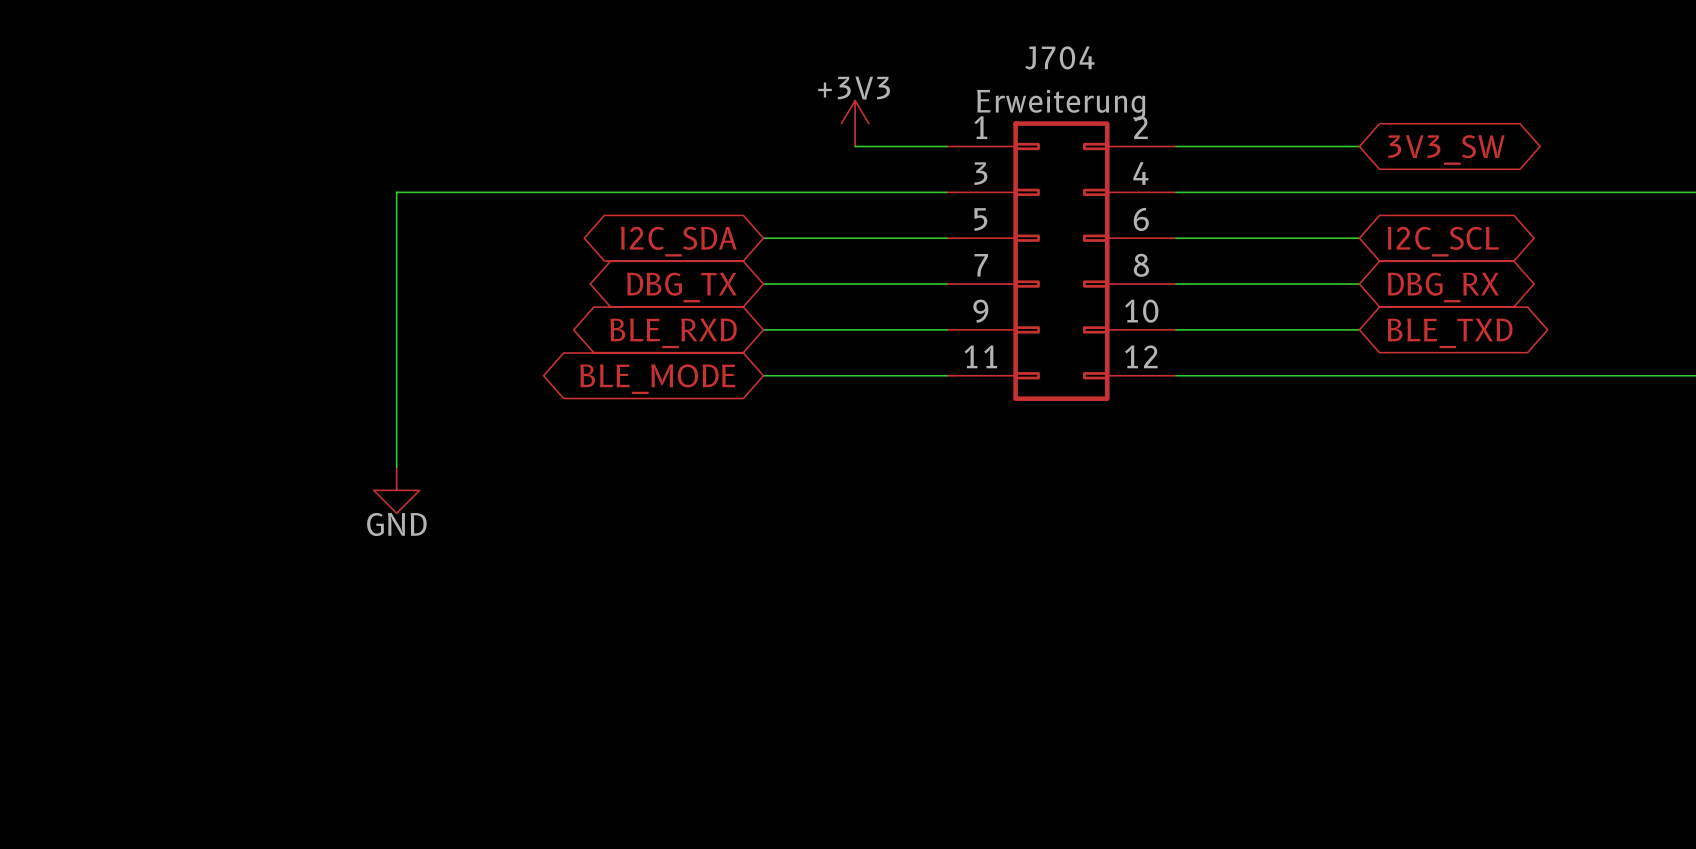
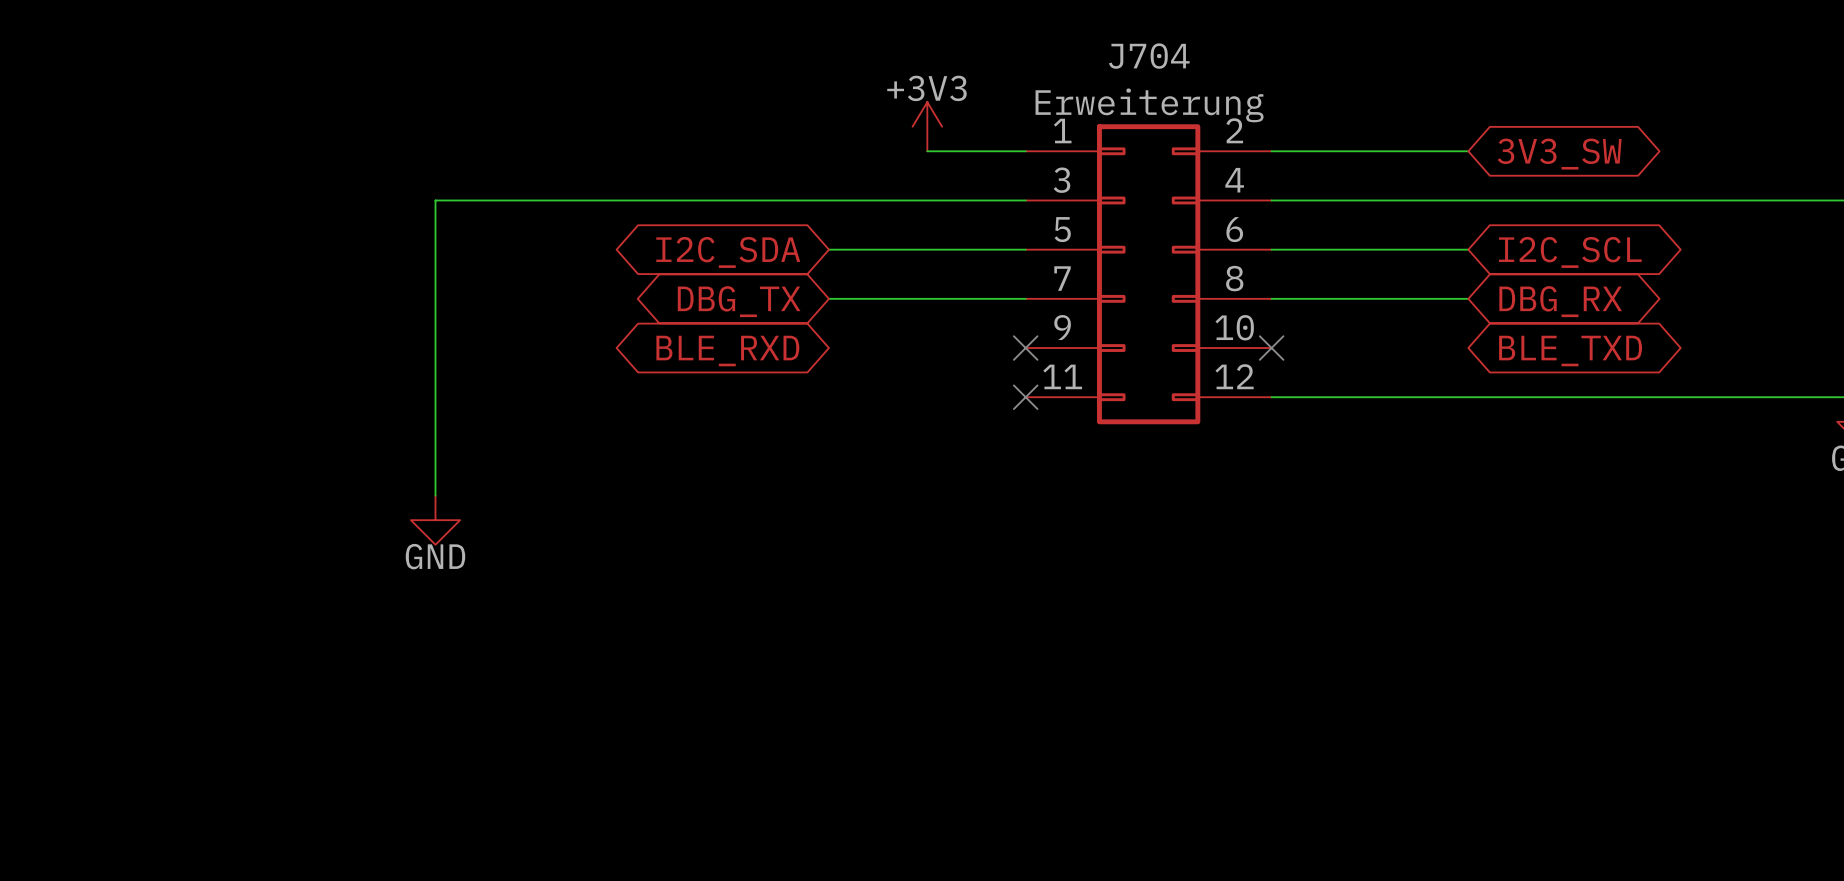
wire: (763, 329) (946, 329) -> none
no-connect mark: none -> (1025, 348)
wire: (1176, 329) (1359, 329) -> none
no-connect mark: none -> (1271, 348)
wire: (763, 375) (946, 375) -> none
no-connect mark: none -> (1025, 397)
global label: BLE_MODE (657, 379) -> none

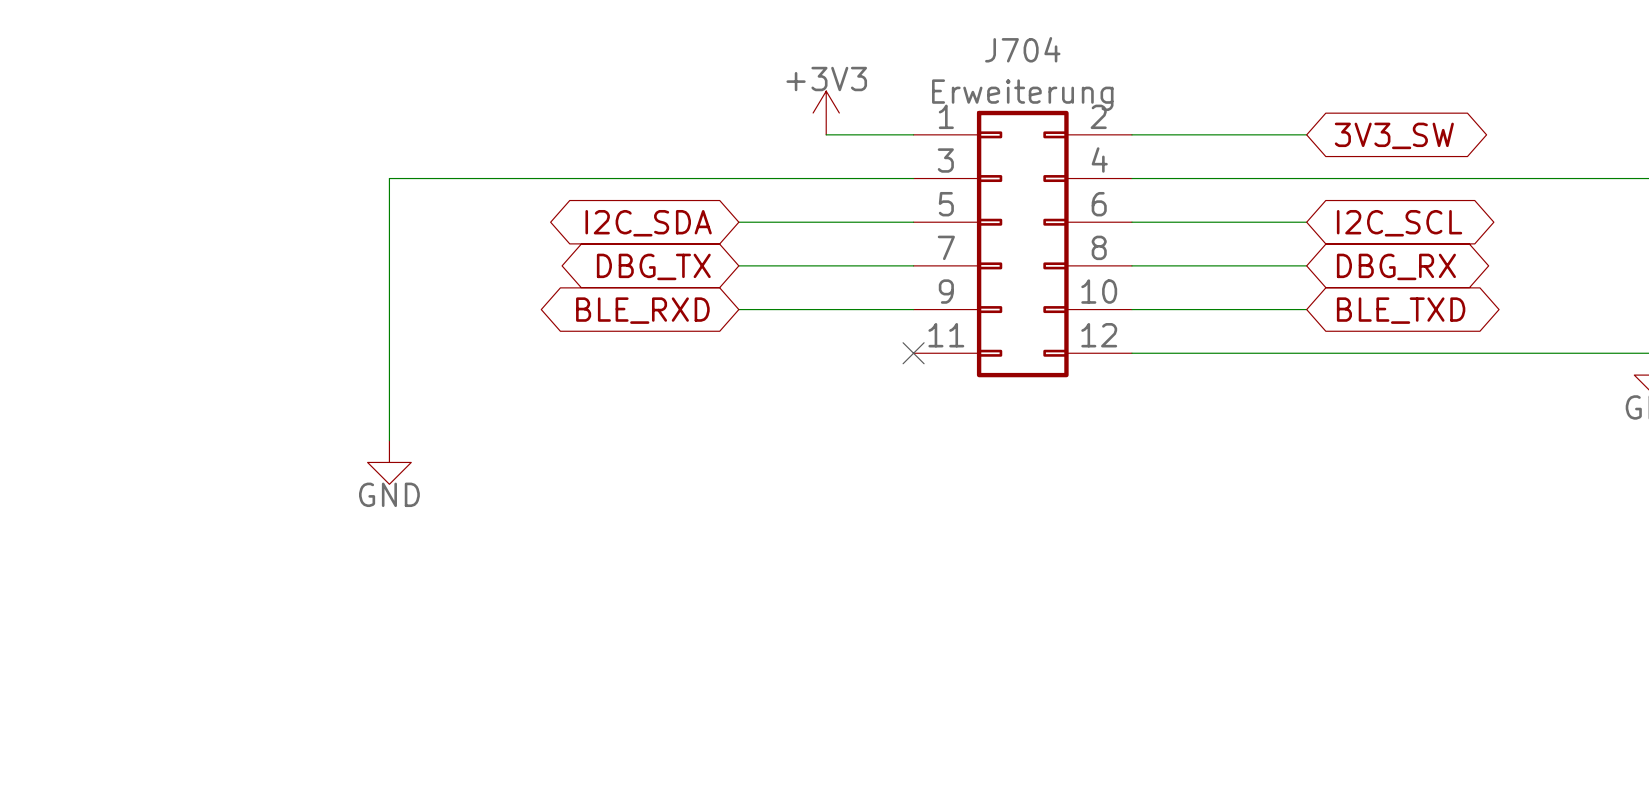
wire: none -> (738, 309) (913, 309)
no-connect mark: (1025, 348) -> none
wire: none -> (1131, 309) (1306, 309)
no-connect mark: (1271, 348) -> none

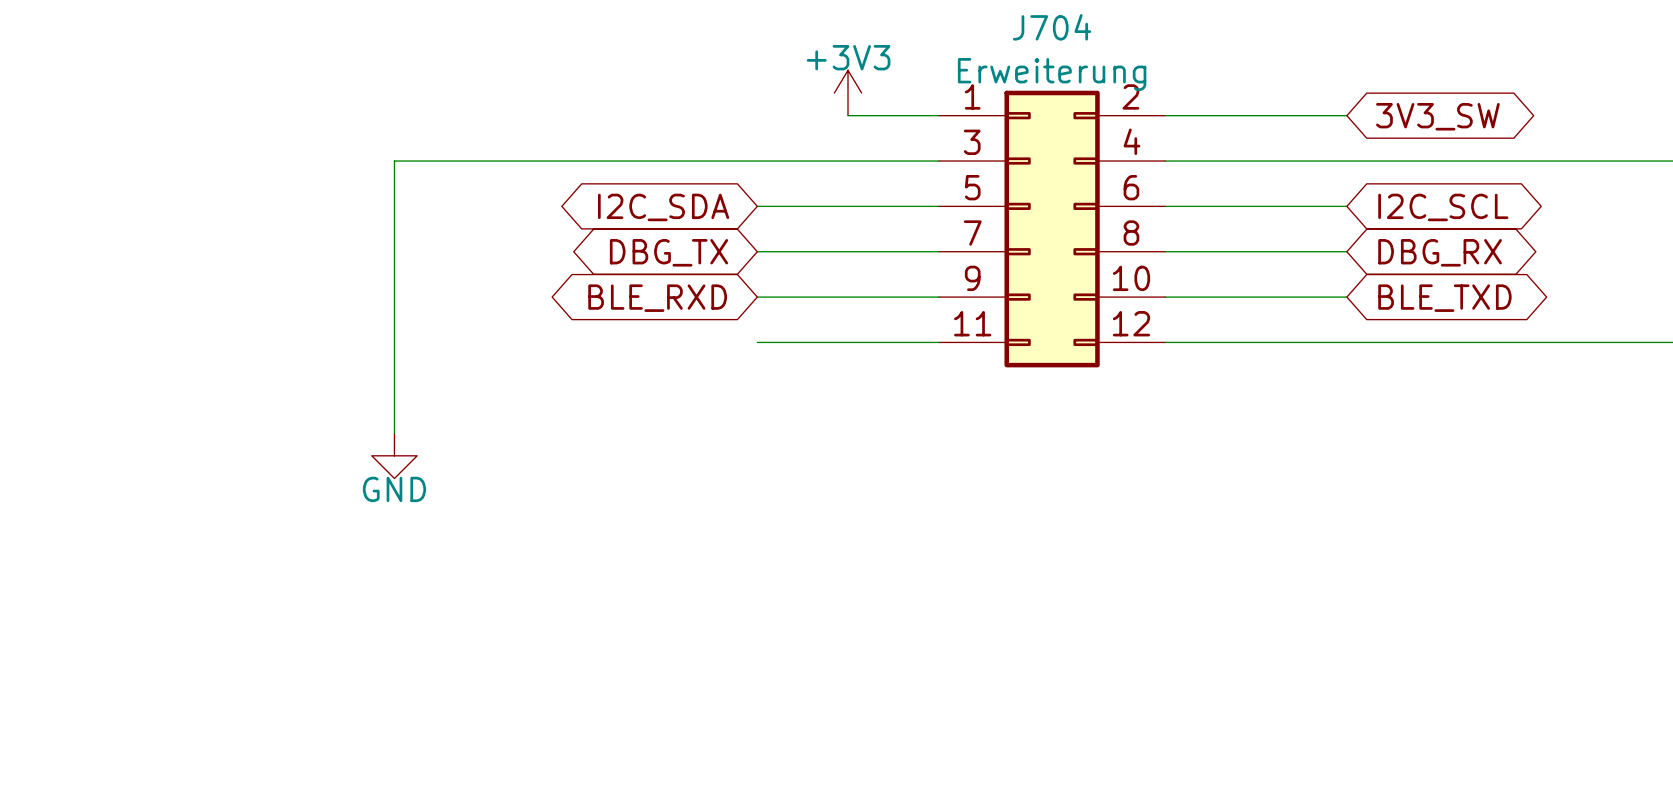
wire: none -> (757, 342) (938, 342)
no-connect mark: (913, 353) -> none

